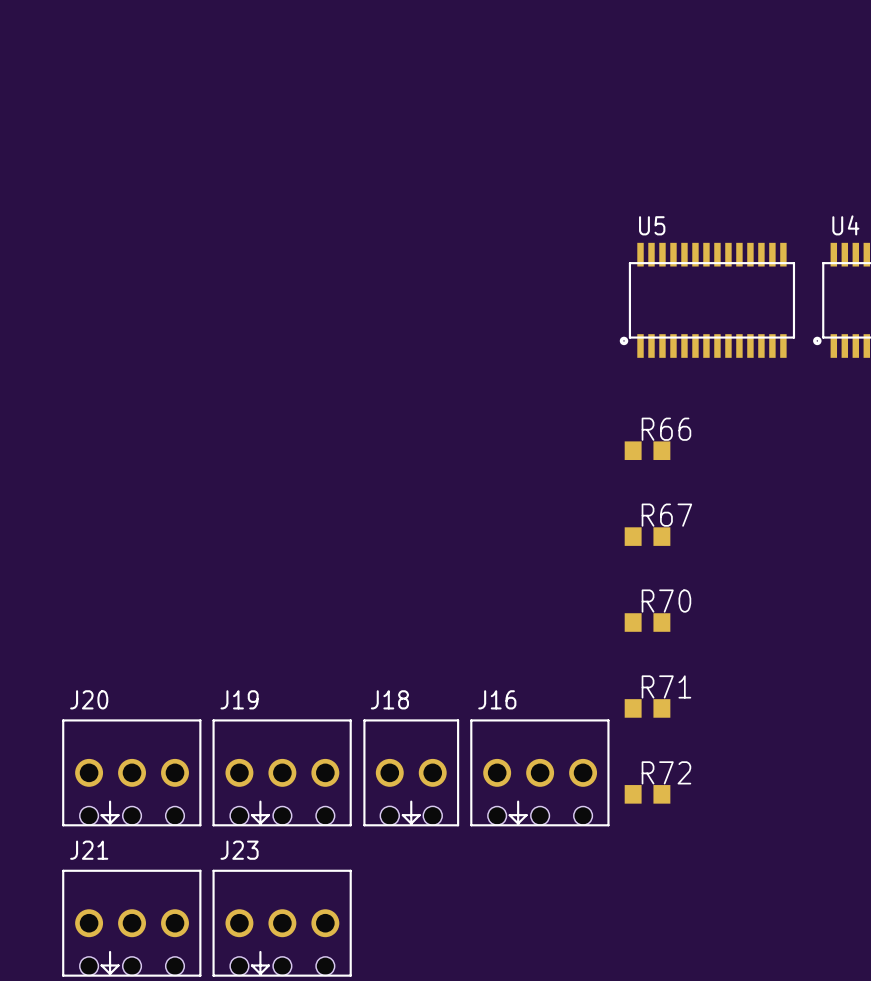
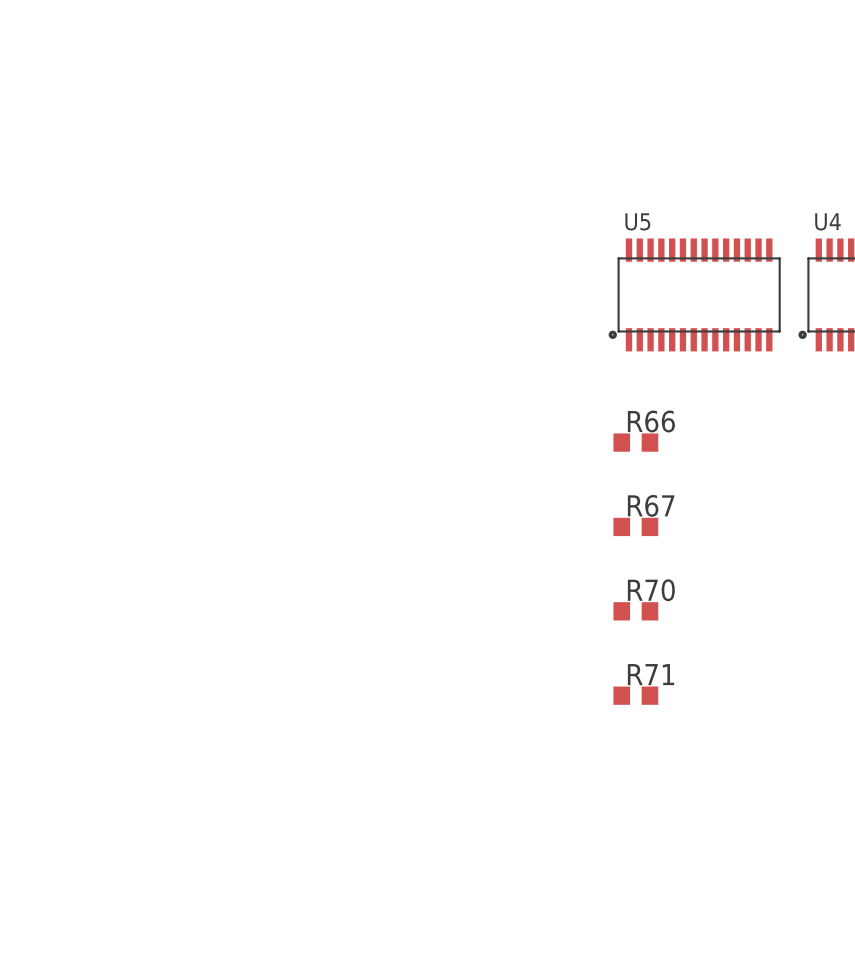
J20: (131, 772) -> none
J19: (282, 772) -> none
J18: (411, 772) -> none
J16: (539, 772) -> none
R72: (647, 794) -> none
J21: (131, 923) -> none
J23: (282, 923) -> none

